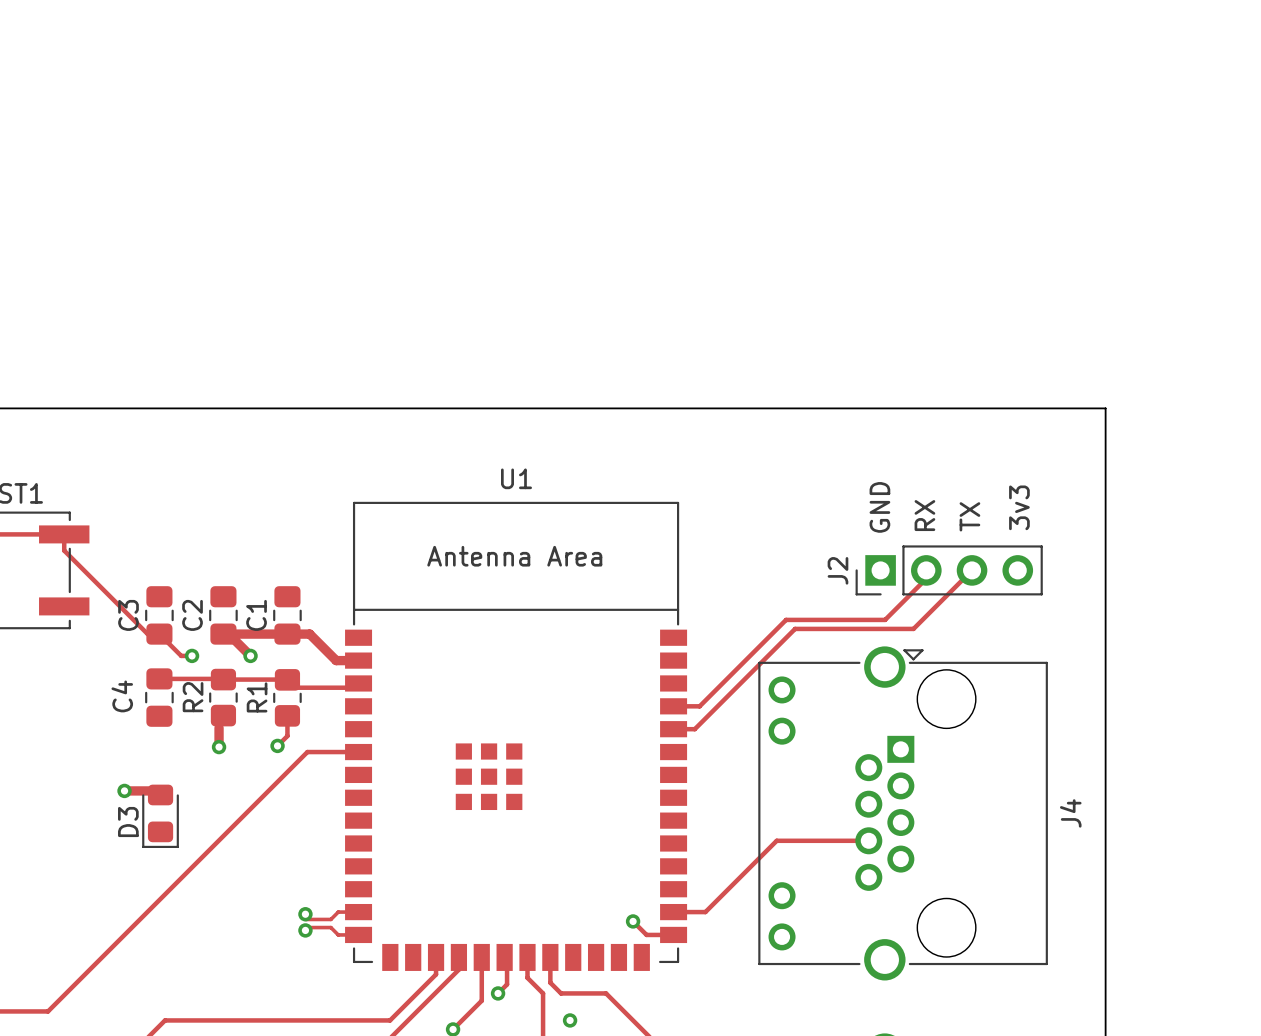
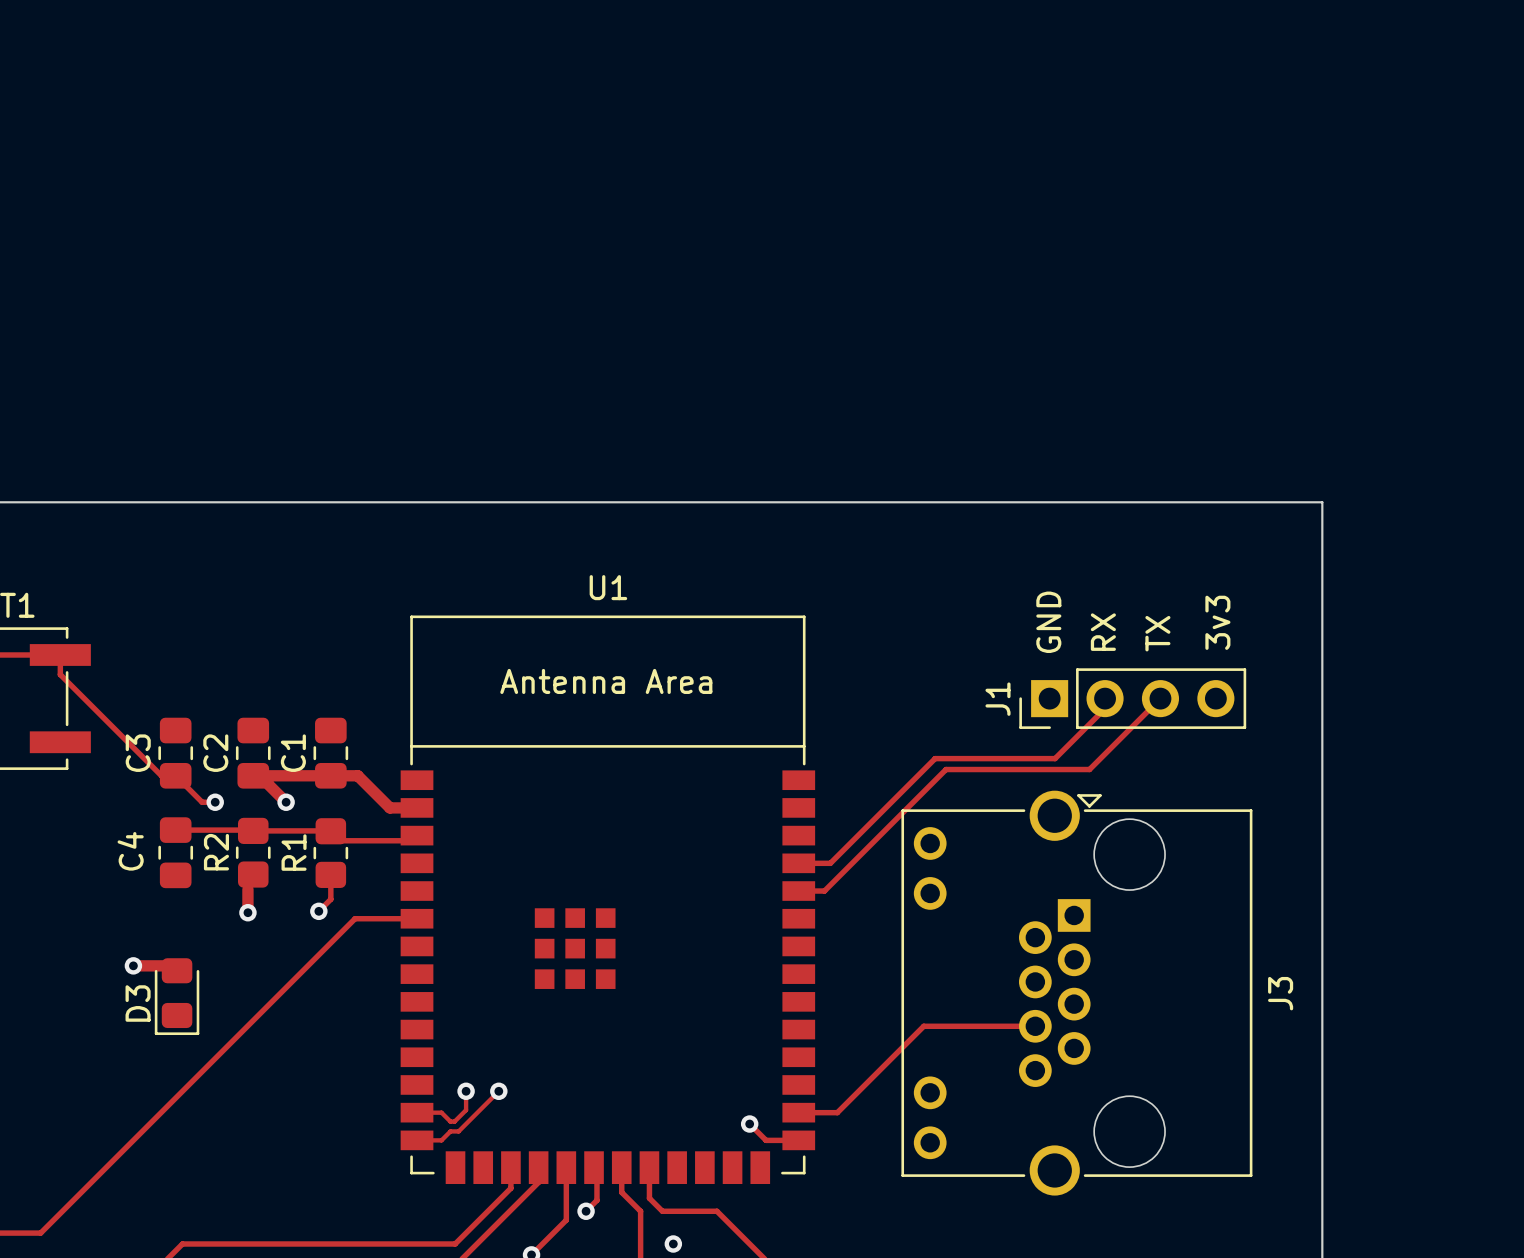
J2 name: J2 (837, 570) -> J1 (998, 699)
J4 name: J4 (1070, 813) -> J3 (1280, 993)
via: none -> (466, 1091)
via: none -> (498, 1091)
track: (358, 912) (338, 912) (330, 919) (305, 919) -> (417, 1112) (441, 1112) (450, 1121) (454, 1121) (466, 1110) (466, 1091)
via: (305, 914) -> none
track: (305, 927) (330, 927) (338, 934) (358, 934) -> (498, 1091) (458, 1131) (450, 1131) (441, 1140) (417, 1140)
via: (305, 930) -> none

